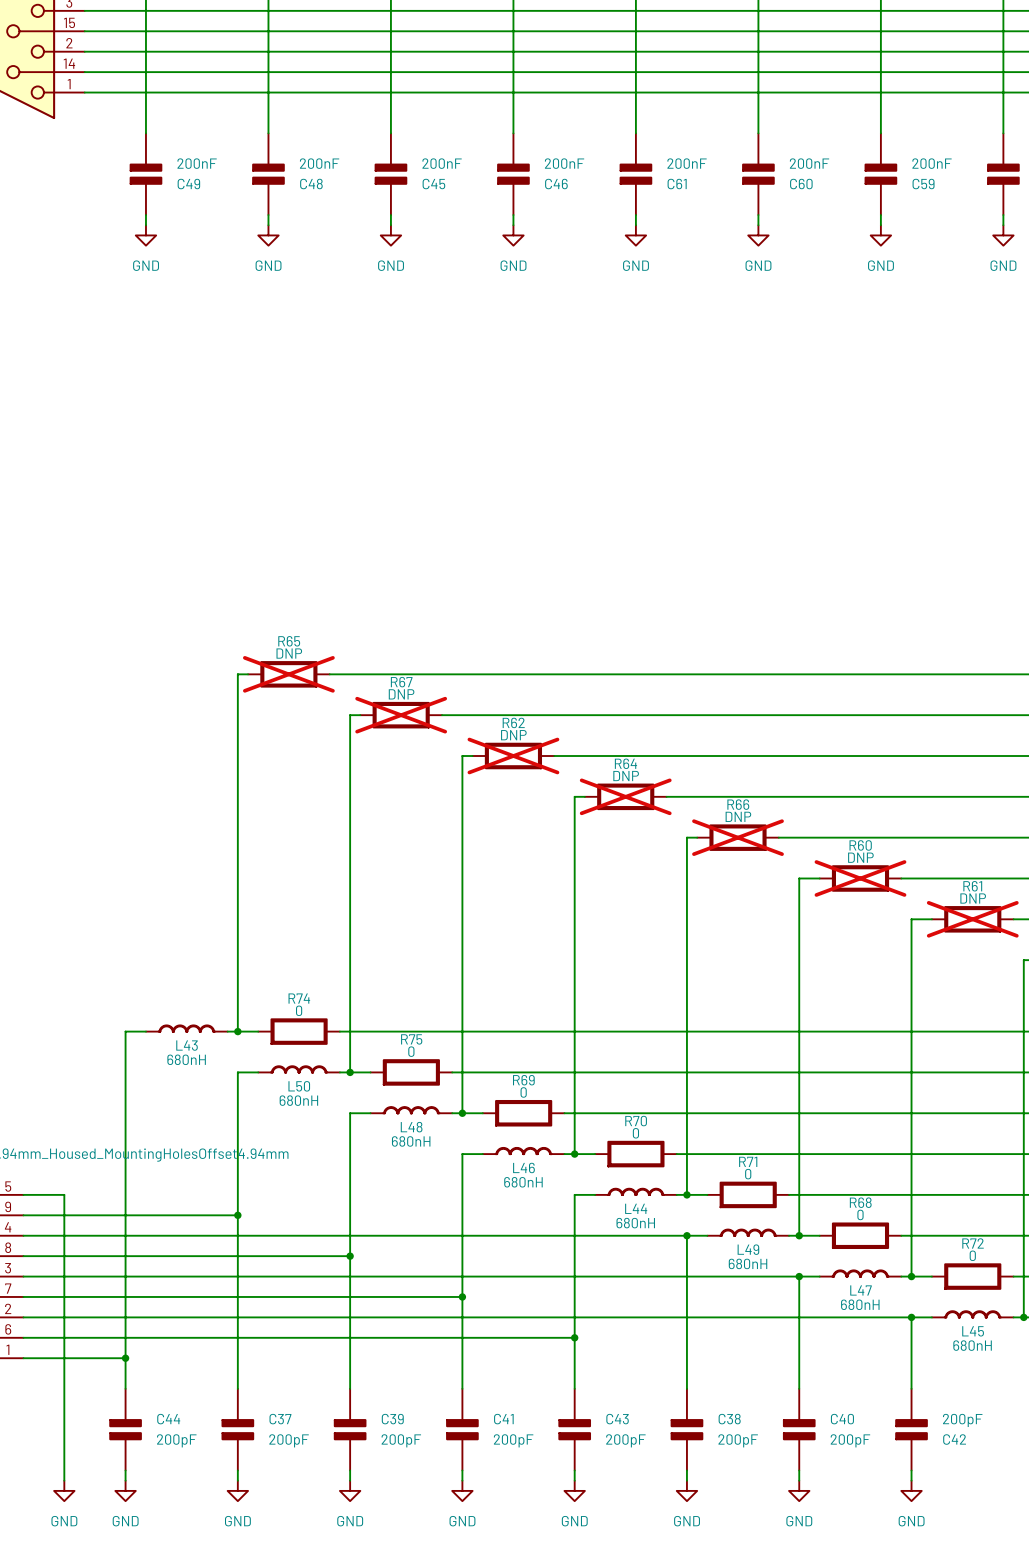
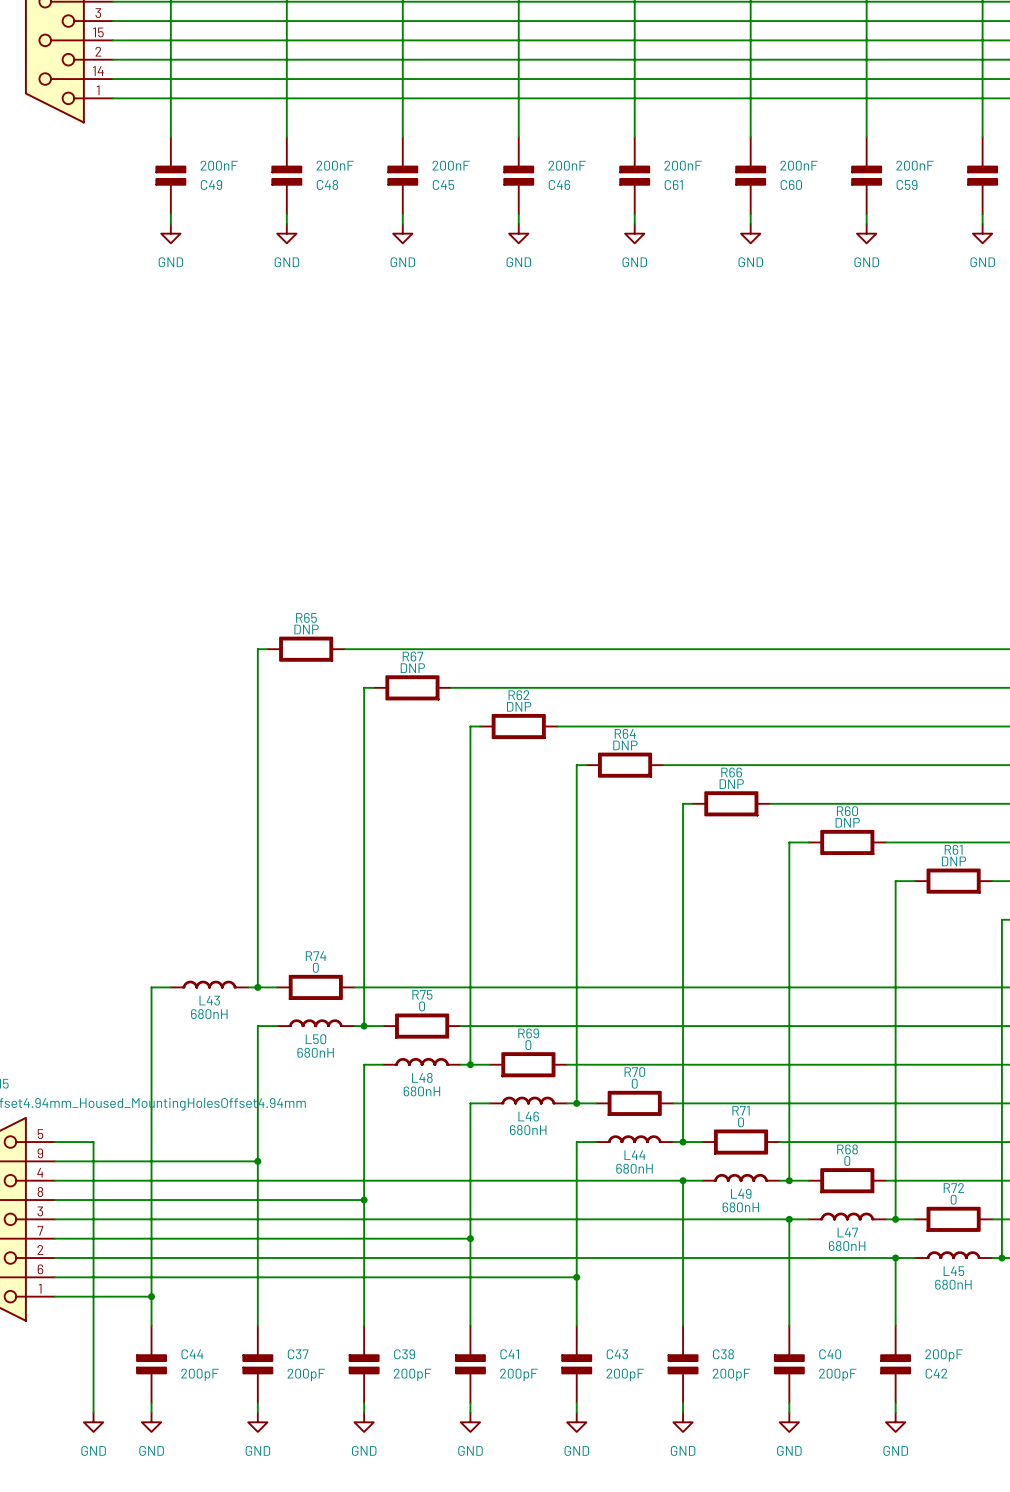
R65 do-not-place cross: (288, 674) -> none
R67 do-not-place cross: (401, 715) -> none
R62 do-not-place cross: (513, 756) -> none
R64 do-not-place cross: (625, 796) -> none
R66 do-not-place cross: (738, 837) -> none
R60 do-not-place cross: (860, 878) -> none
R61 do-not-place cross: (972, 919) -> none

